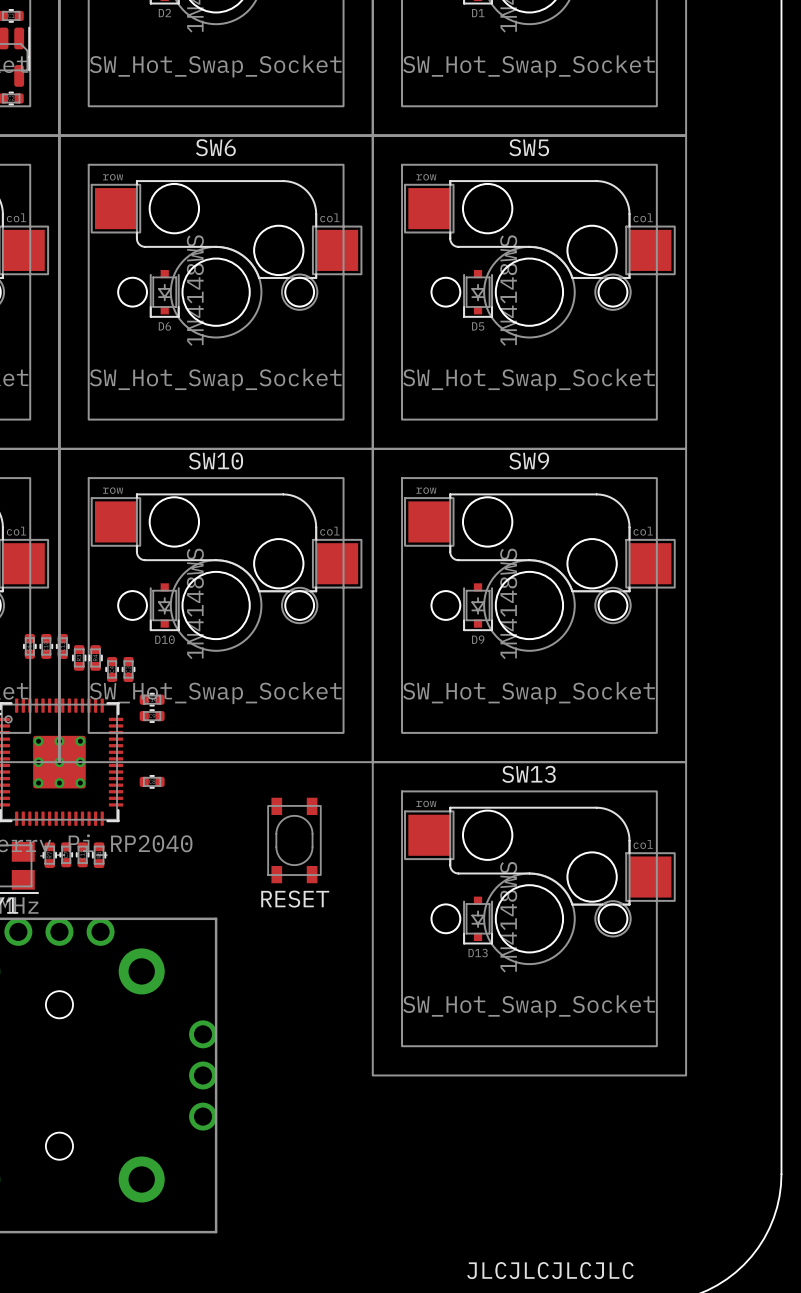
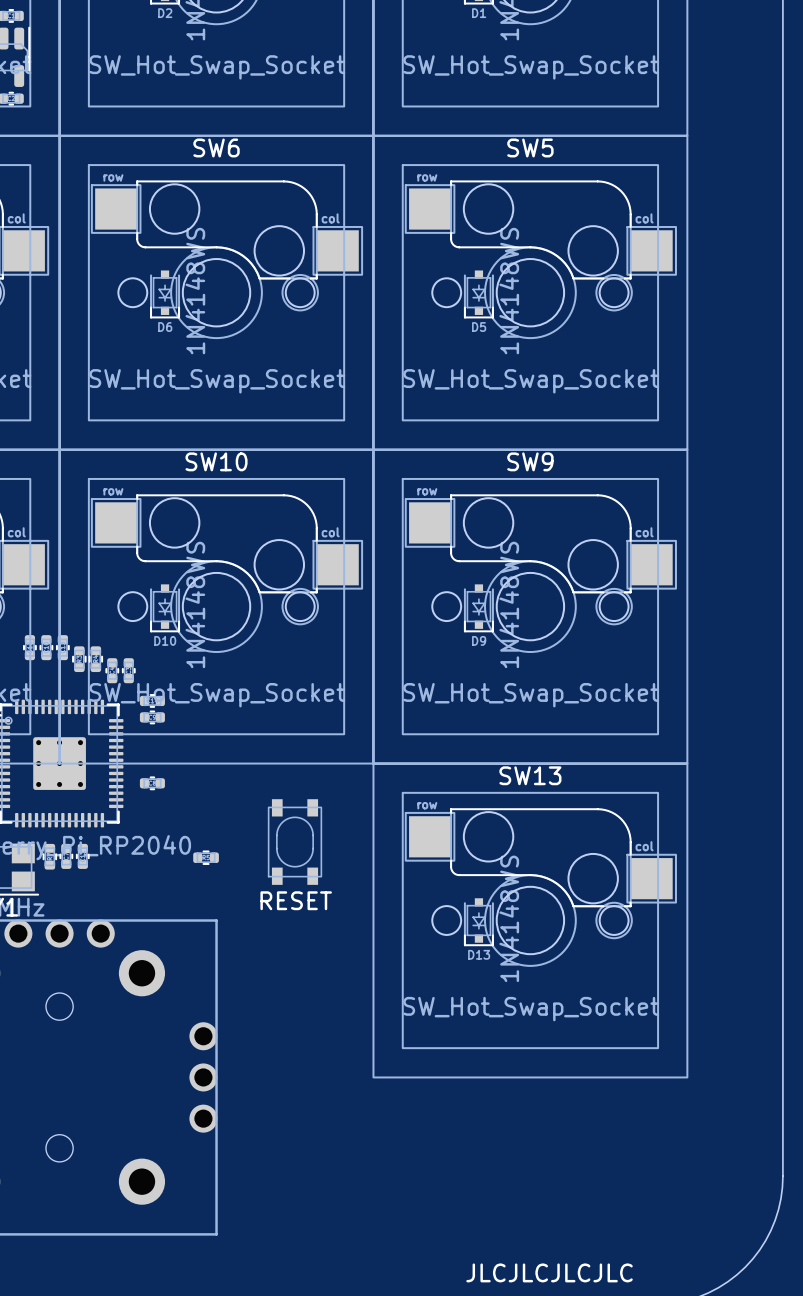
part rotation: 0° (99, 855) -> 90° clockwise (206, 857)
part position: (99, 855) -> (206, 857)

